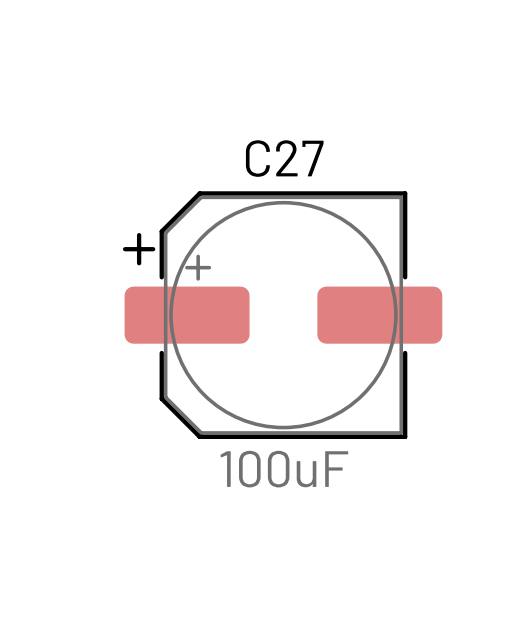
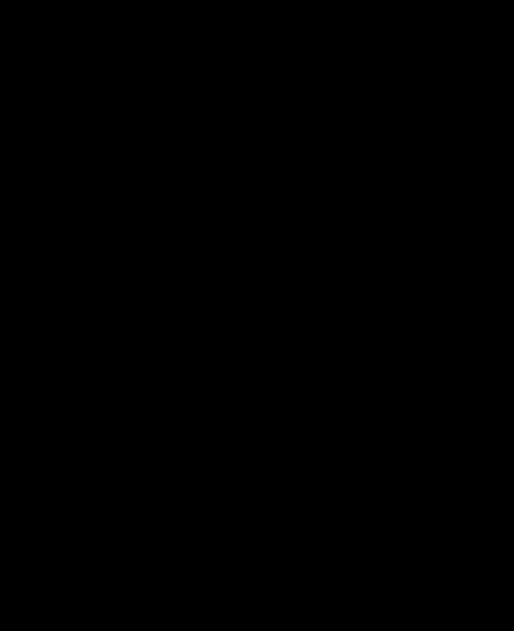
C27: 100uF (282, 315) -> none

